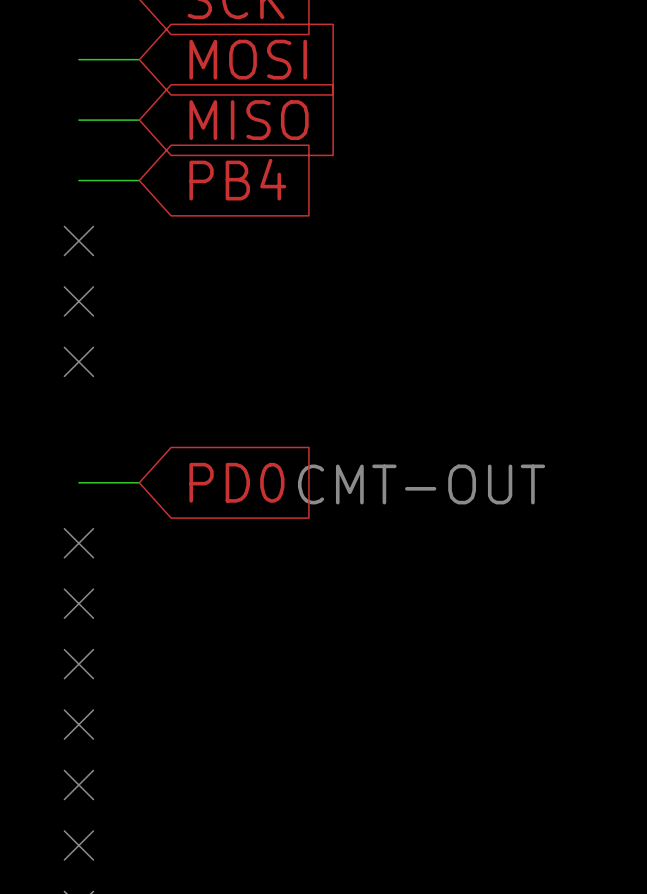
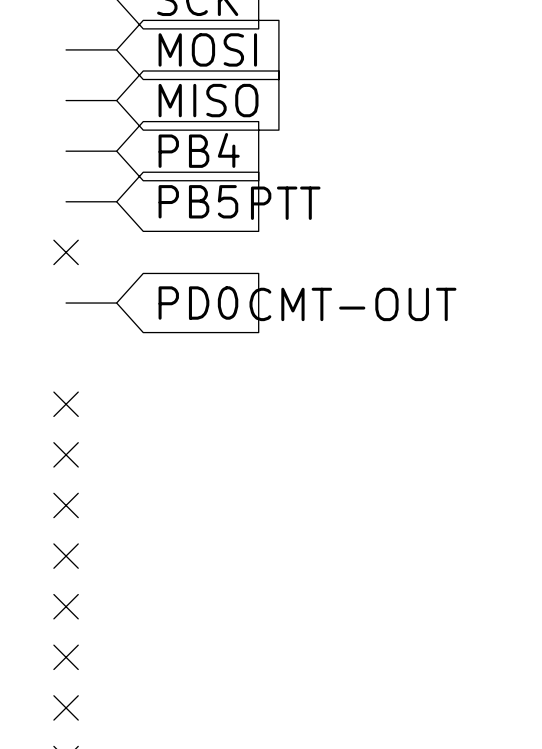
wire: none -> (66, 201) (116, 201)
no-connect mark: (78, 240) -> none
global label: none -> PB5 (198, 201)
text: none -> PTT (285, 203)
no-connect mark: (78, 361) -> none
wire: (78, 482) (139, 482) -> (66, 303) (116, 303)
no-connect mark: none -> (66, 404)
global label position: PD0 (236, 482) -> PD0 (198, 303)
text position: CMT-OUT (421, 484) -> CMT-OUT (352, 304)

